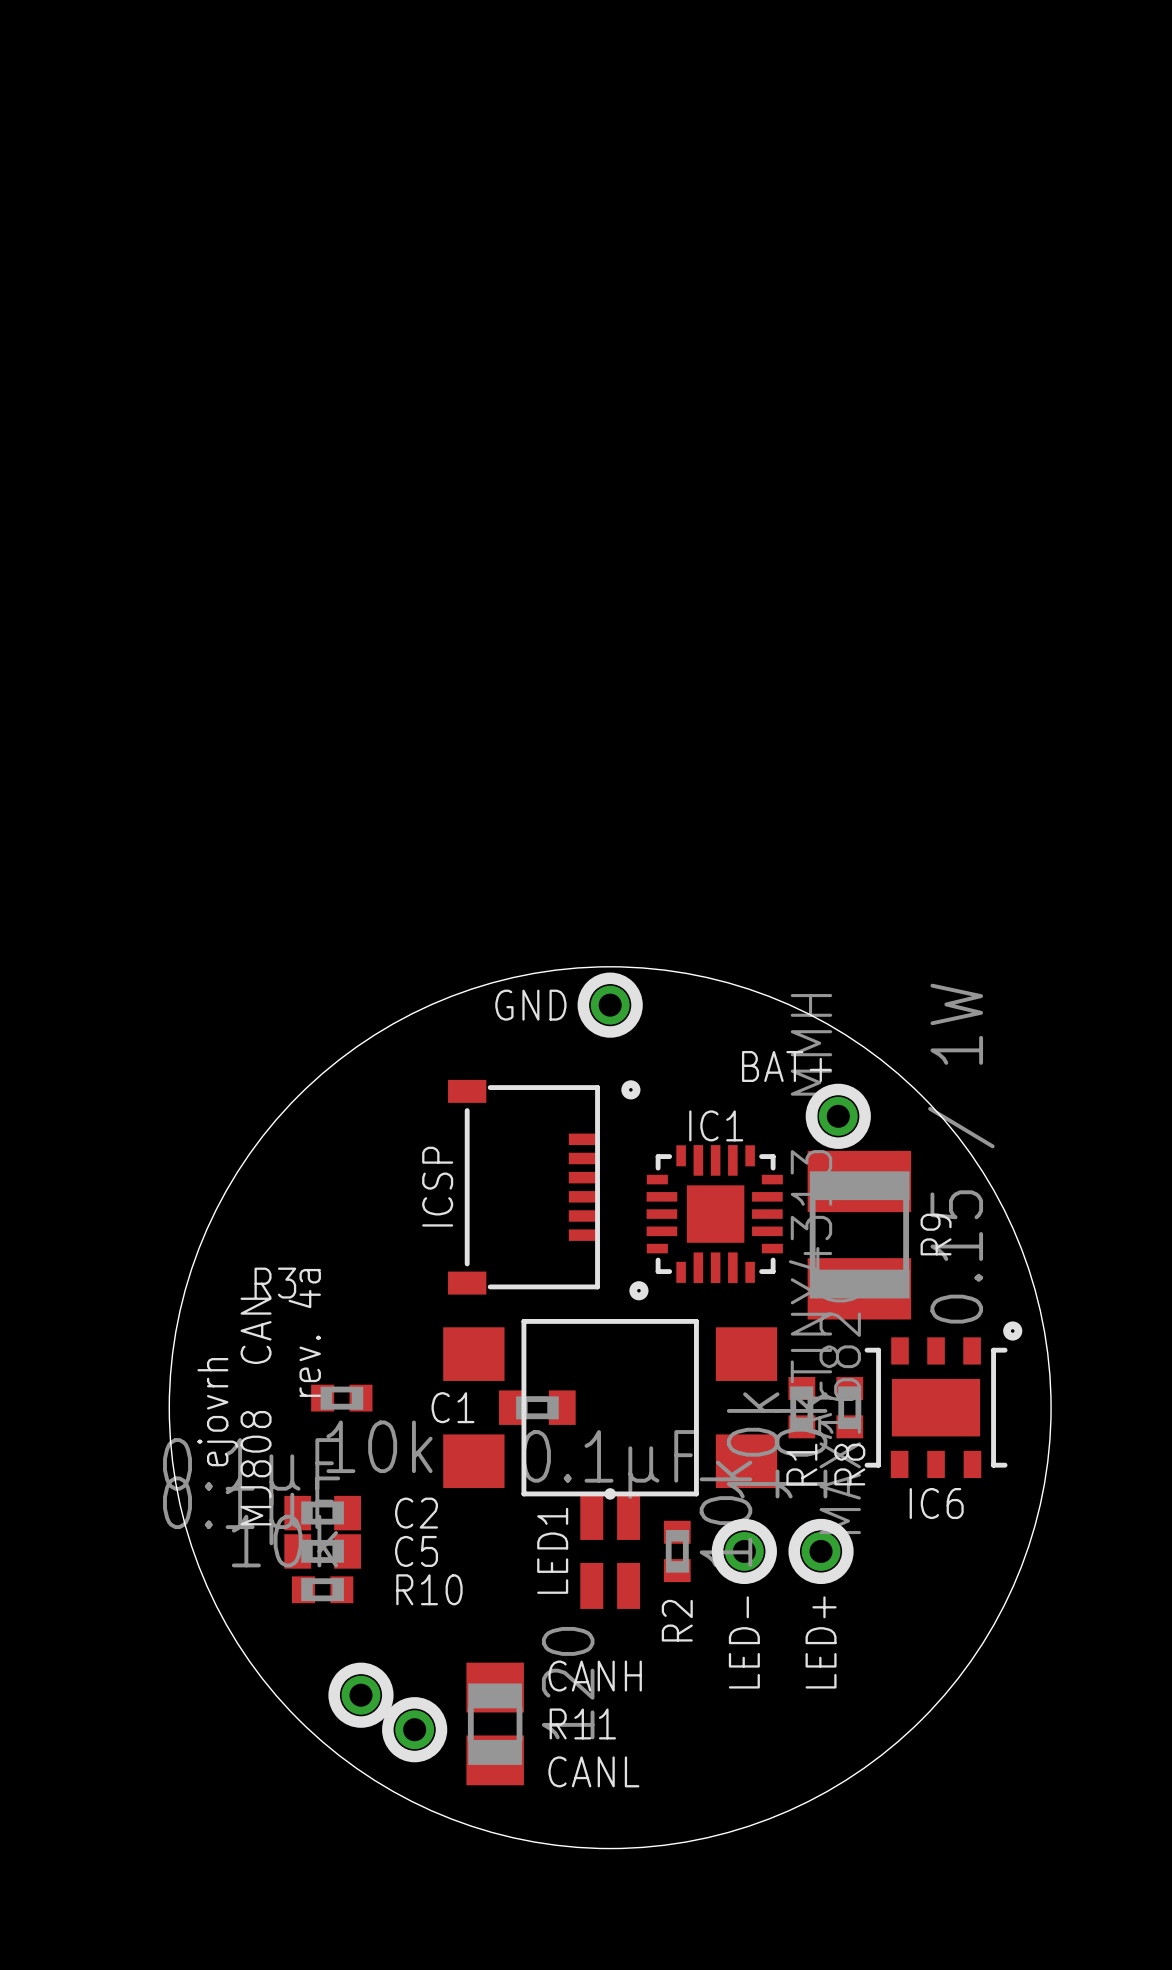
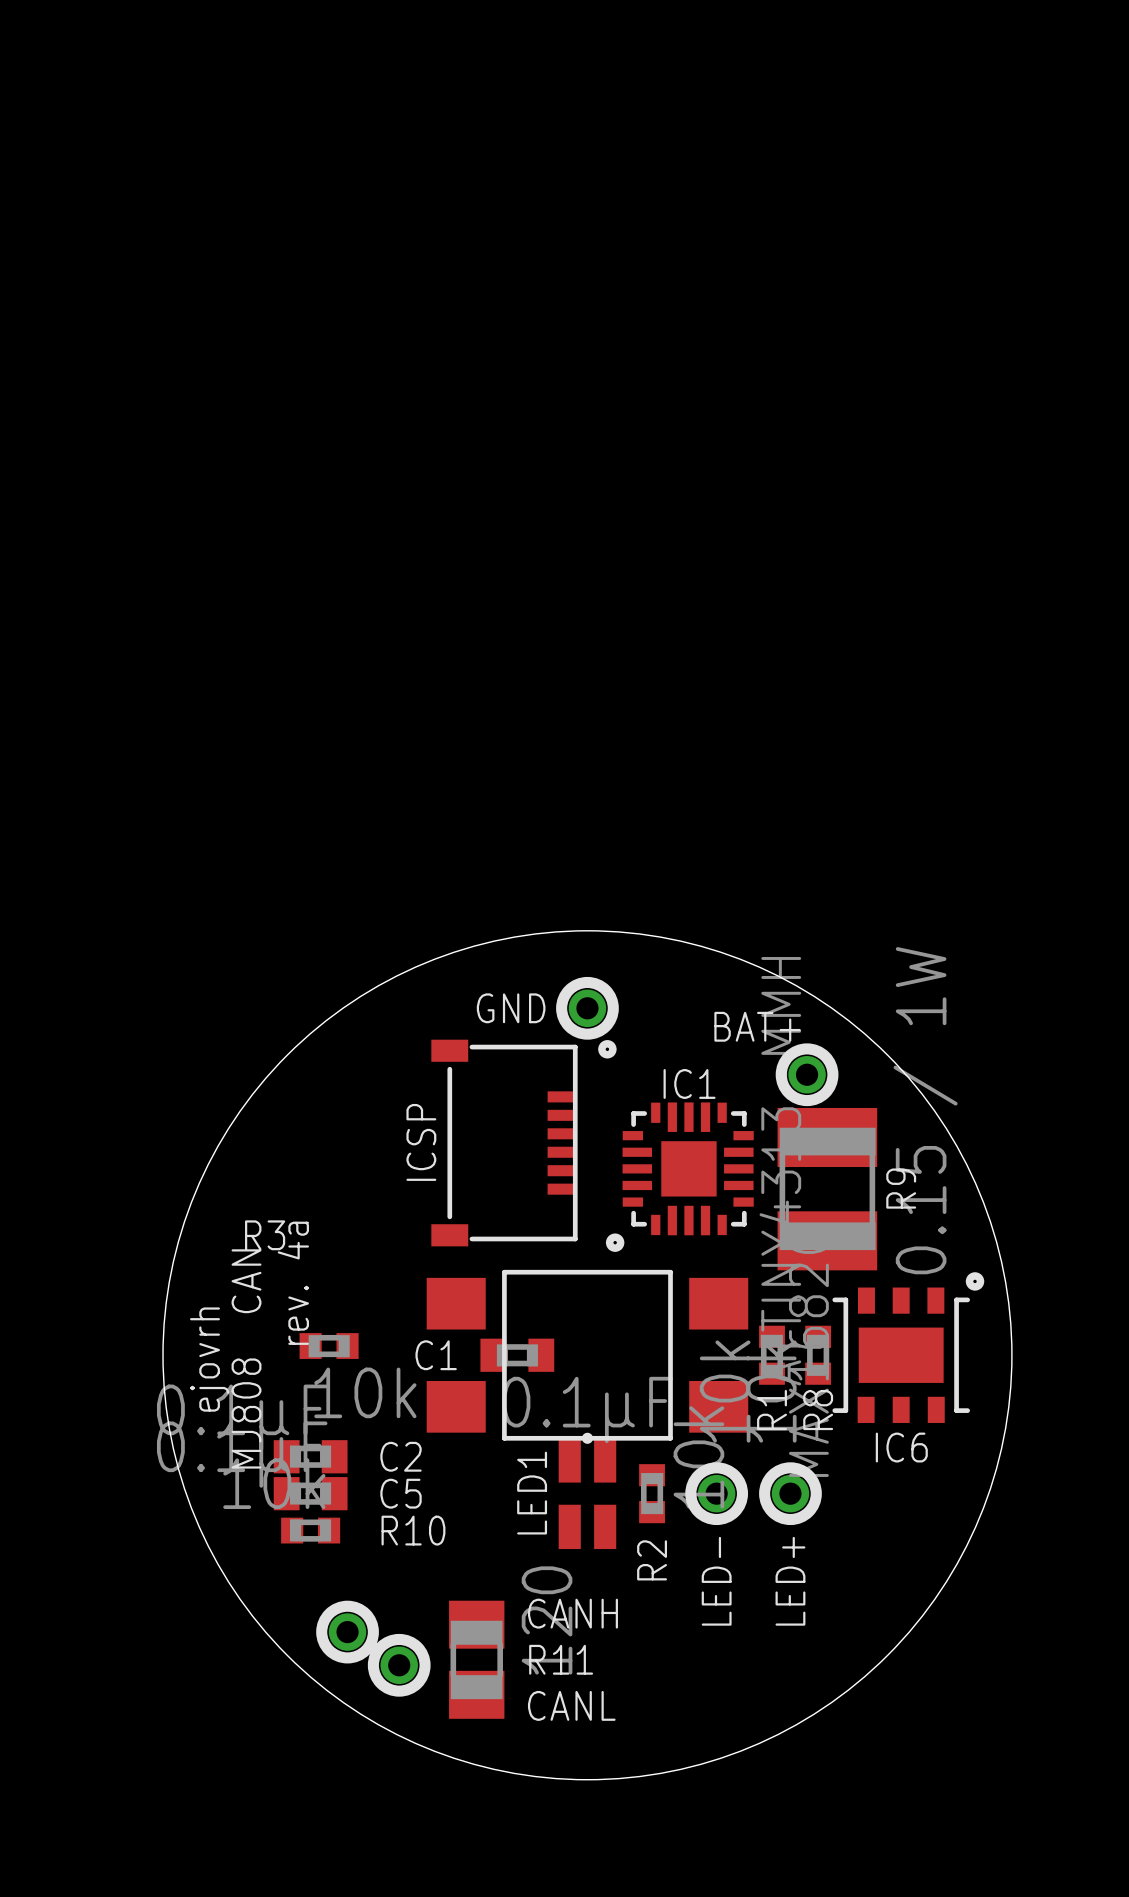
GND position: (610, 1005) -> (587, 1008)

